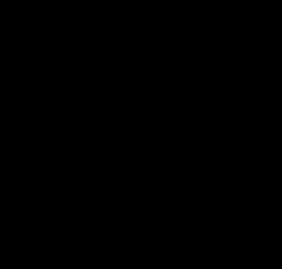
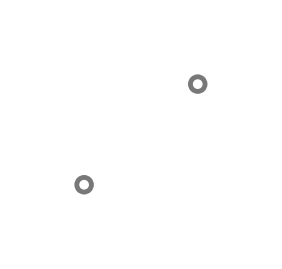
via: none -> (197, 84)
via: none -> (84, 184)

